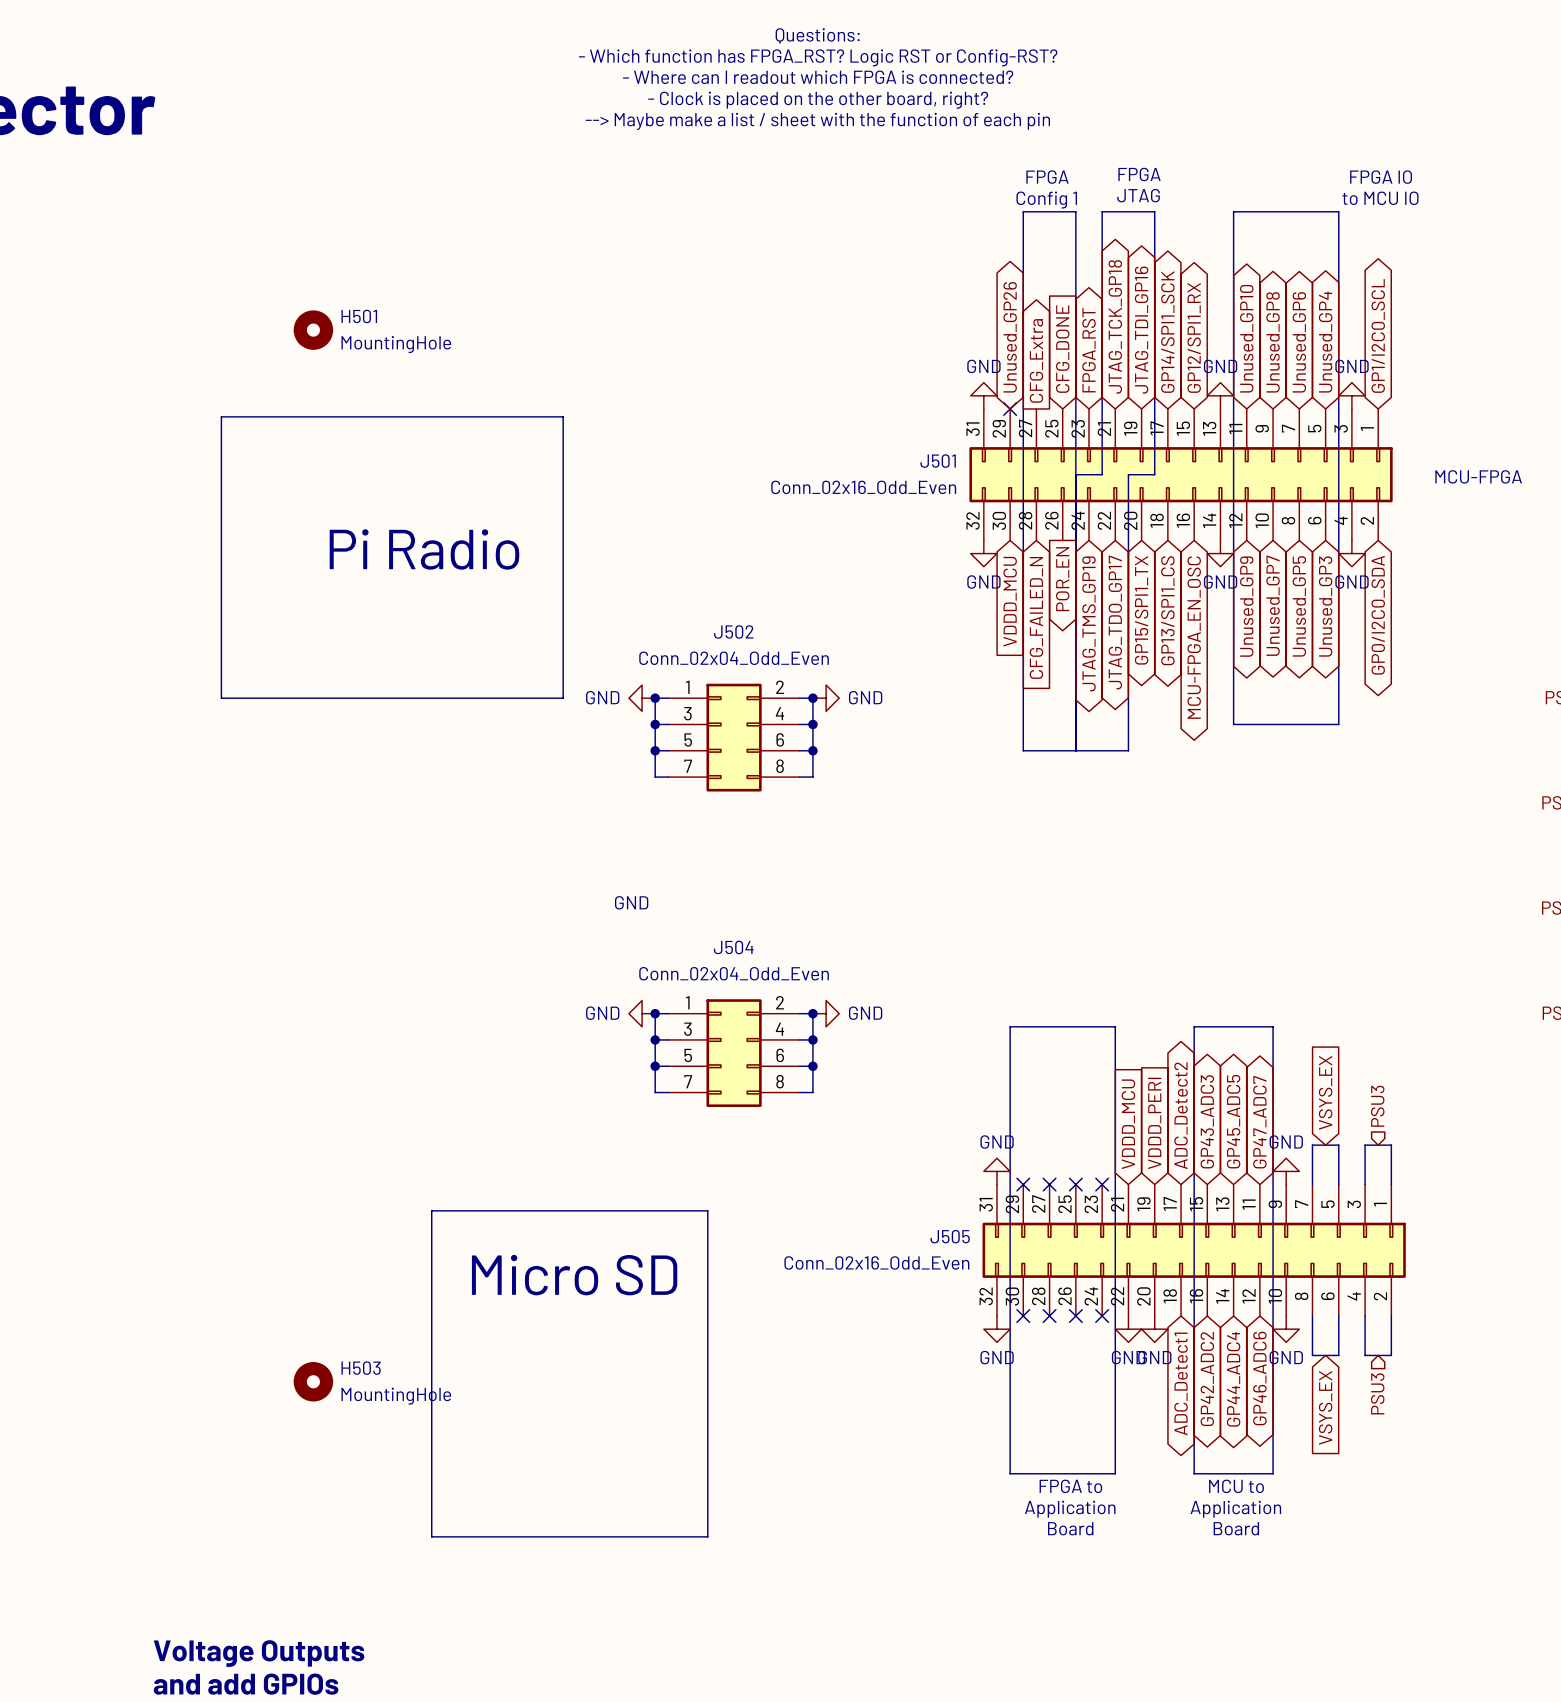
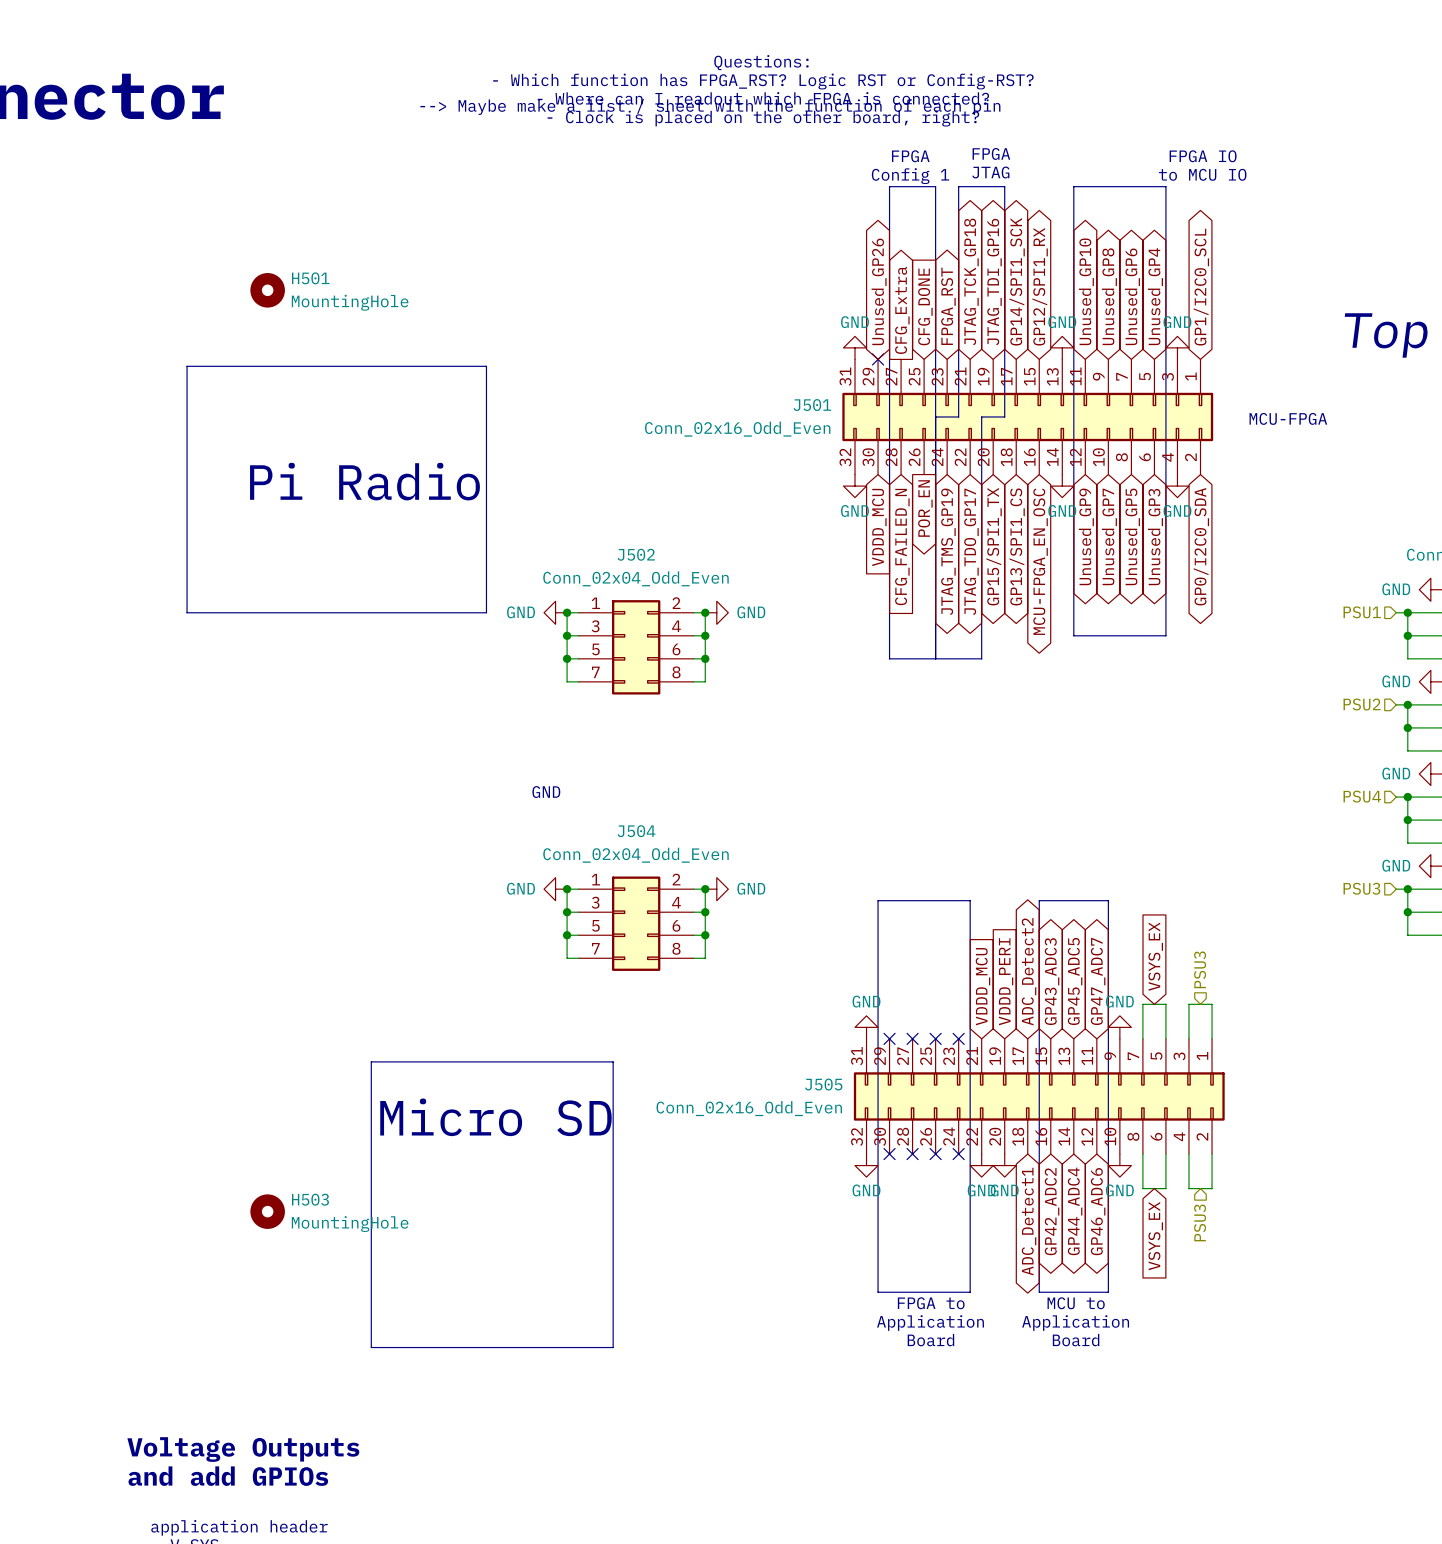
text position: Questions: (817, 35) -> Questions: (761, 62)
text position: - Which function has FPGA_RST? Logic RST or Config-RST? (818, 57) -> - Which function has FPGA_RST? Logic RST or Config-RST? (763, 81)
text position: - Where can I readout which FPGA is connected? (818, 77) -> - Where can I readout which FPGA is connected? (763, 98)
text position: - Clock is placed on the other board, right? (818, 100) -> - Clock is placed on the other board, right? (763, 118)

